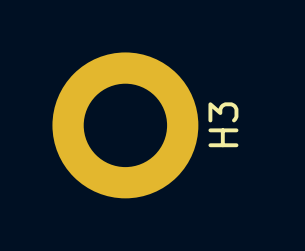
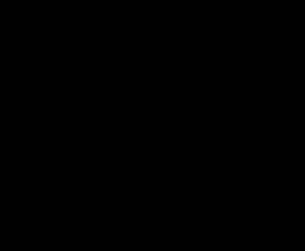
H3: (125, 125) -> none

